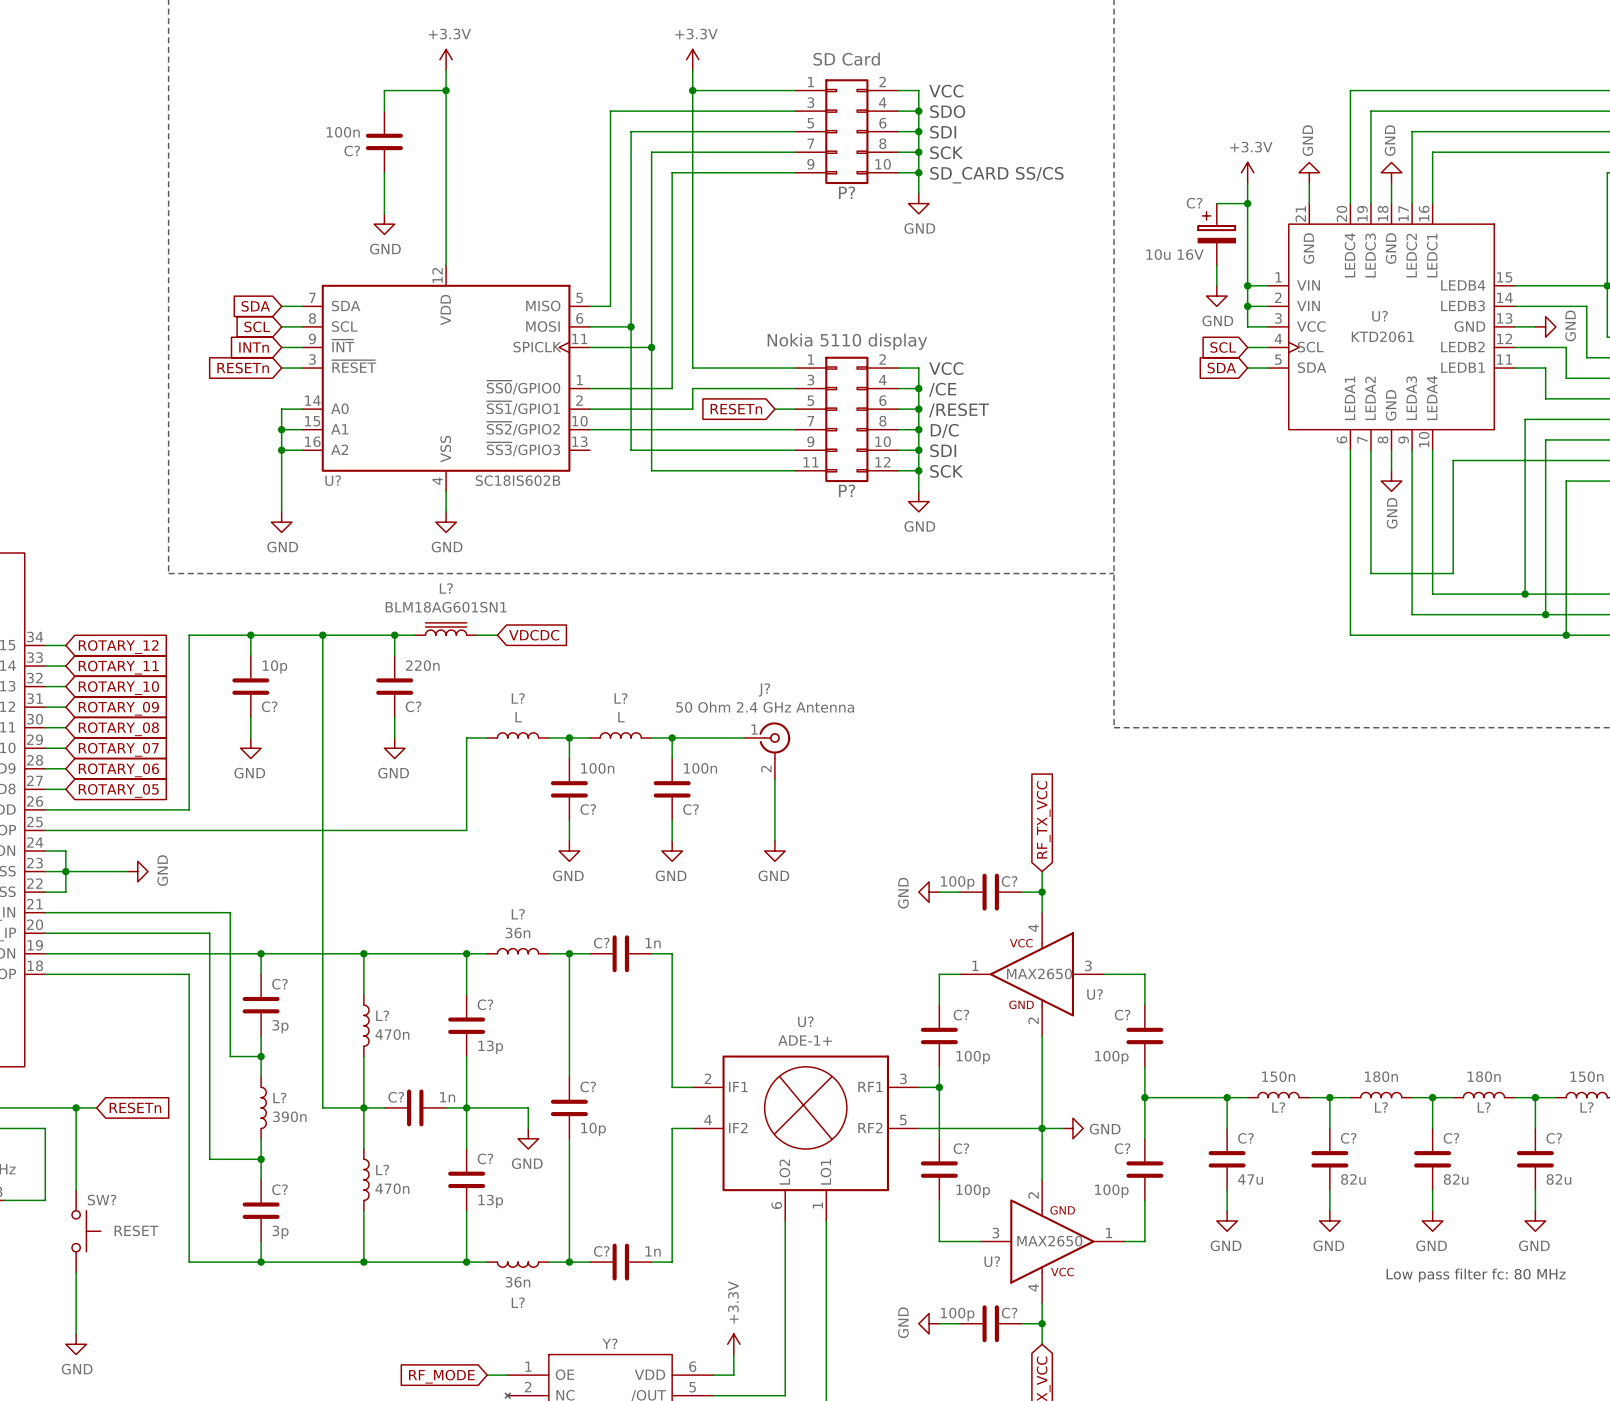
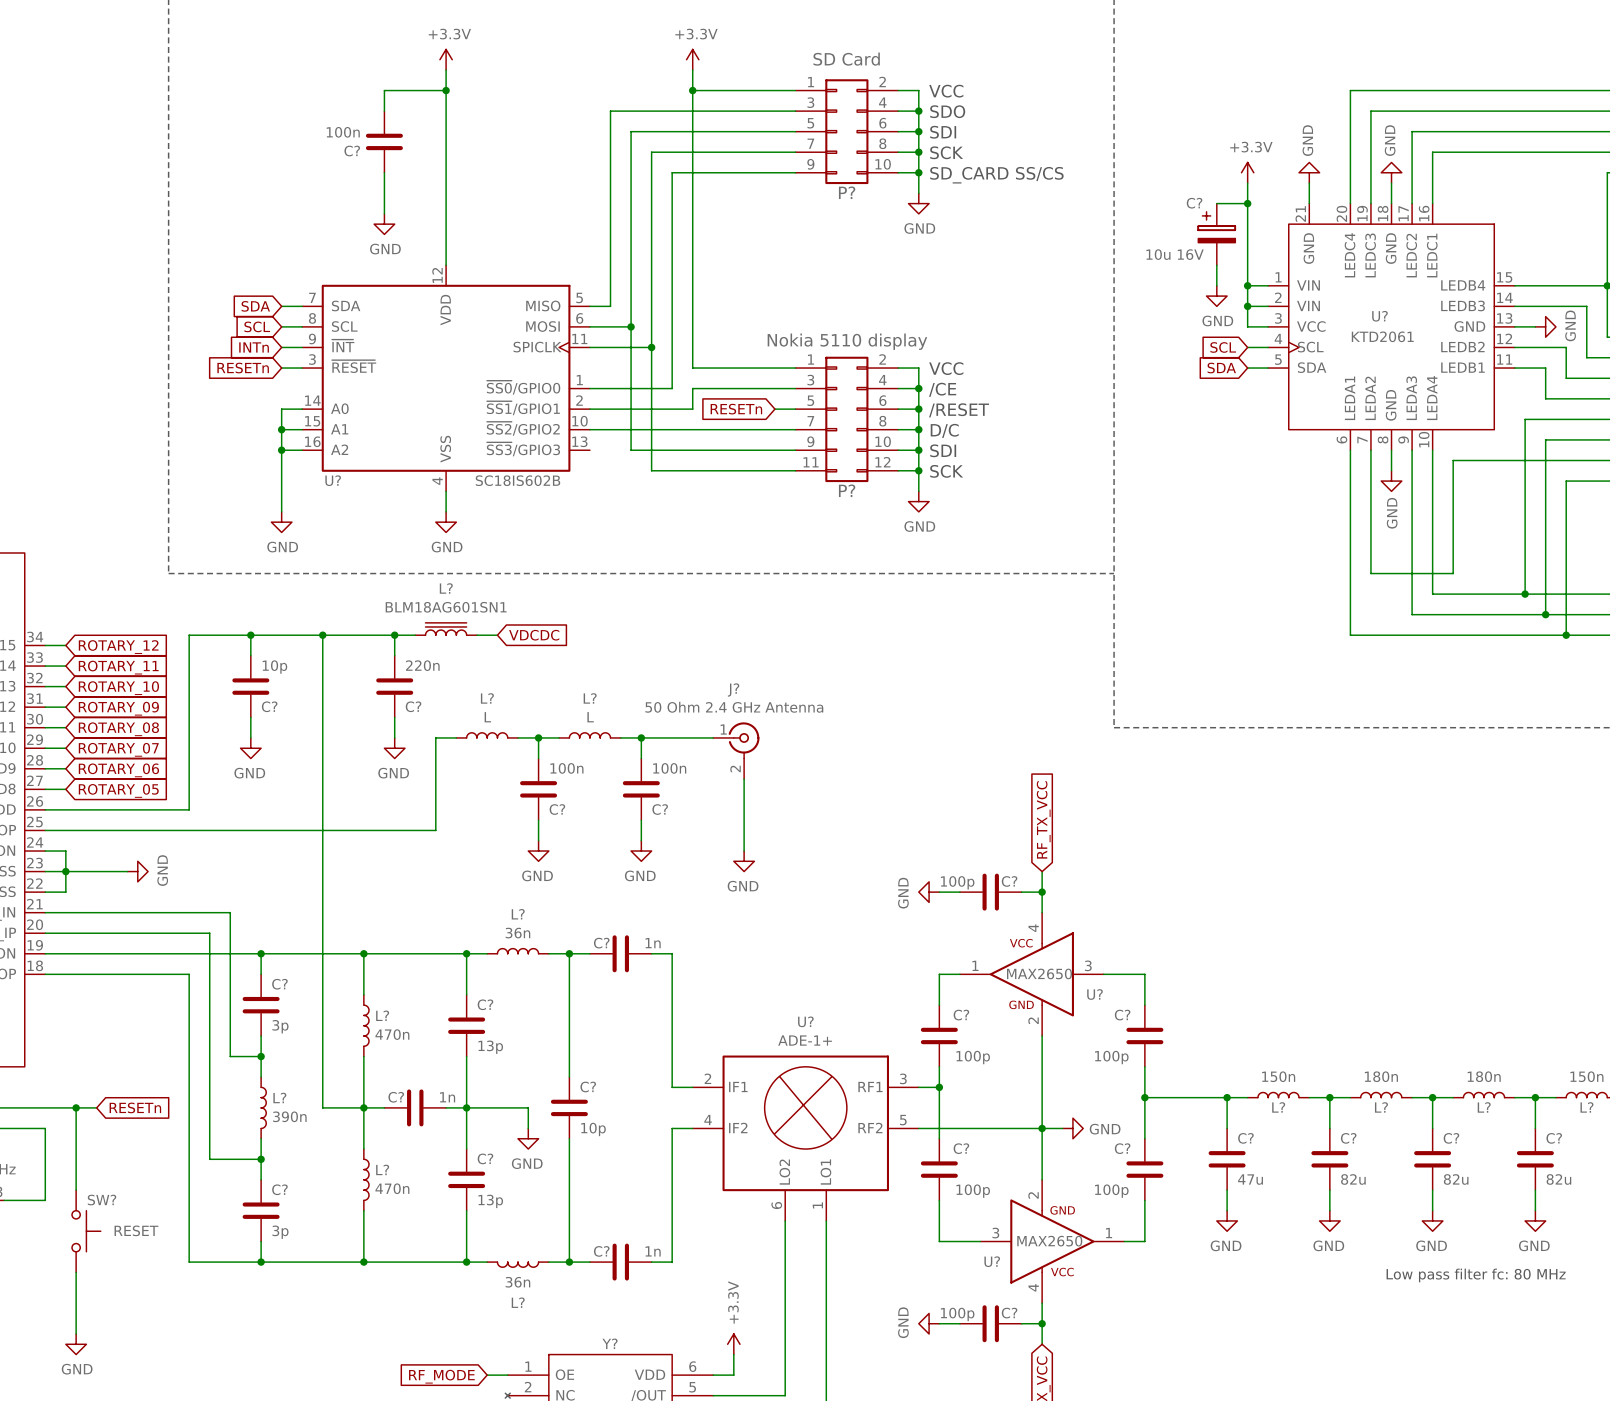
L? position: (518, 735) -> (487, 735)
L? position: (620, 735) -> (589, 735)
wire: (487, 737) (466, 737) (466, 830) (435, 830) -> (456, 737) (435, 737) (435, 830)
wire: (559, 737) (589, 737) -> (518, 737) (548, 737)
wire: (569, 737) (569, 758) -> (538, 737) (538, 758)
junction position: (569, 737) -> (538, 737)
wire: (672, 737) (672, 758) -> (641, 737) (641, 758)
junction position: (672, 737) -> (641, 737)
J? position: (767, 750) -> (736, 750)
wire: none -> (744, 779) (744, 851)
wire: (774, 779) (774, 840) -> none
C? position: (569, 789) -> (538, 789)
C? position: (672, 789) -> (641, 789)
wire: (569, 820) (569, 840) -> (538, 820) (538, 840)
wire: (672, 820) (672, 840) -> (641, 820) (641, 840)
power symbol position: GND (569, 851) -> GND (538, 851)
power symbol position: GND (672, 851) -> GND (641, 851)
power symbol position: GND (774, 851) -> GND (744, 861)

